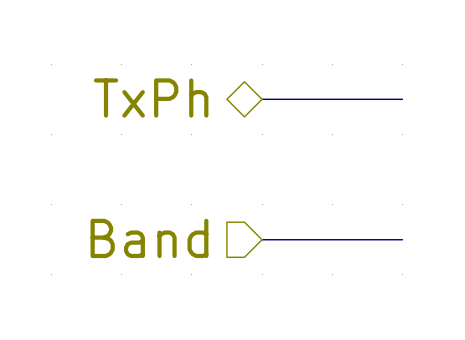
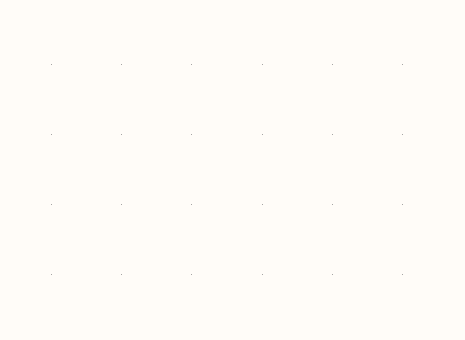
hierarchical label: TxPh (151, 98) -> none
bus: (262, 99) (402, 99) -> none
hierarchical label: Band (149, 238) -> none
bus: (262, 239) (402, 239) -> none

